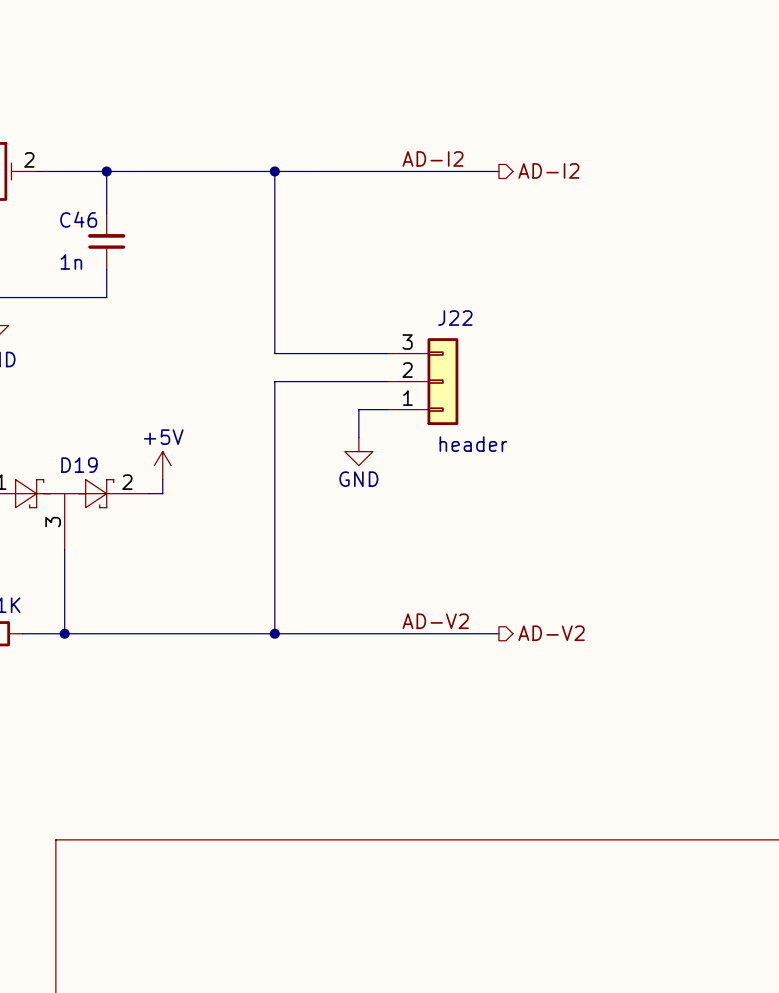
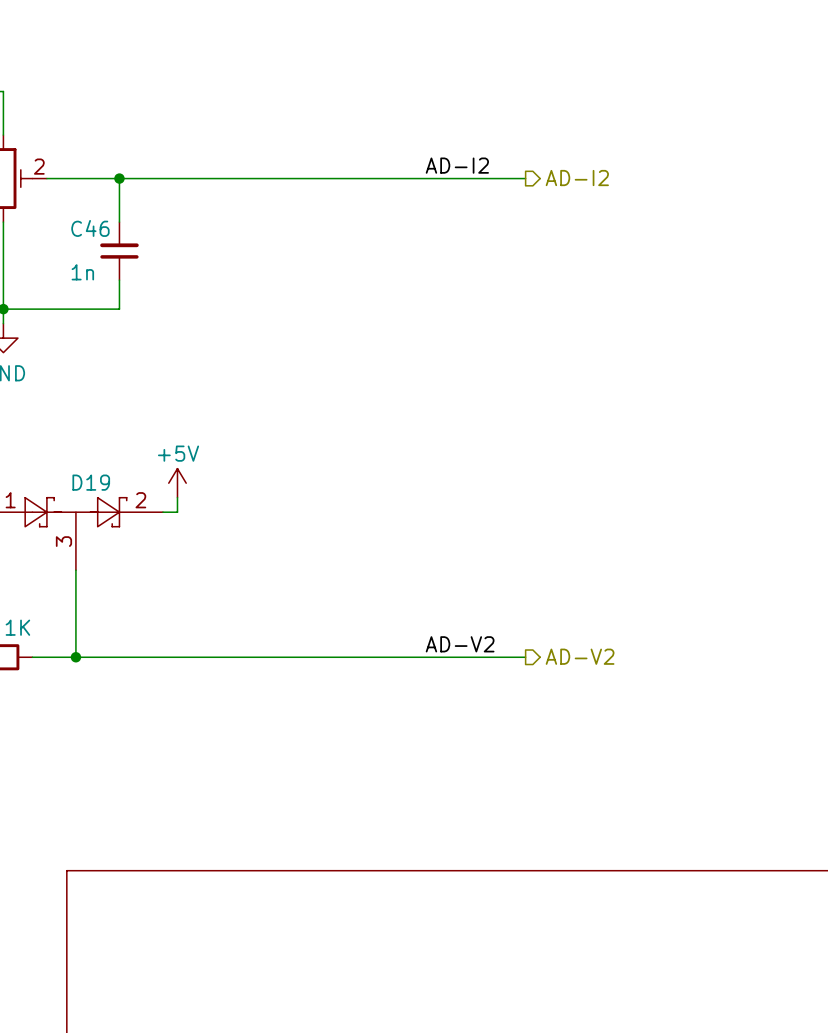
wire: (274, 171) (274, 353) (386, 353) -> none
junction: (274, 171) -> none
wire: (386, 381) (274, 381) (274, 633) -> none
J22: header (422, 381) -> none
wire: (386, 409) (358, 409) (358, 437) -> none
power symbol: GND (358, 451) -> none
junction: (274, 633) -> none

